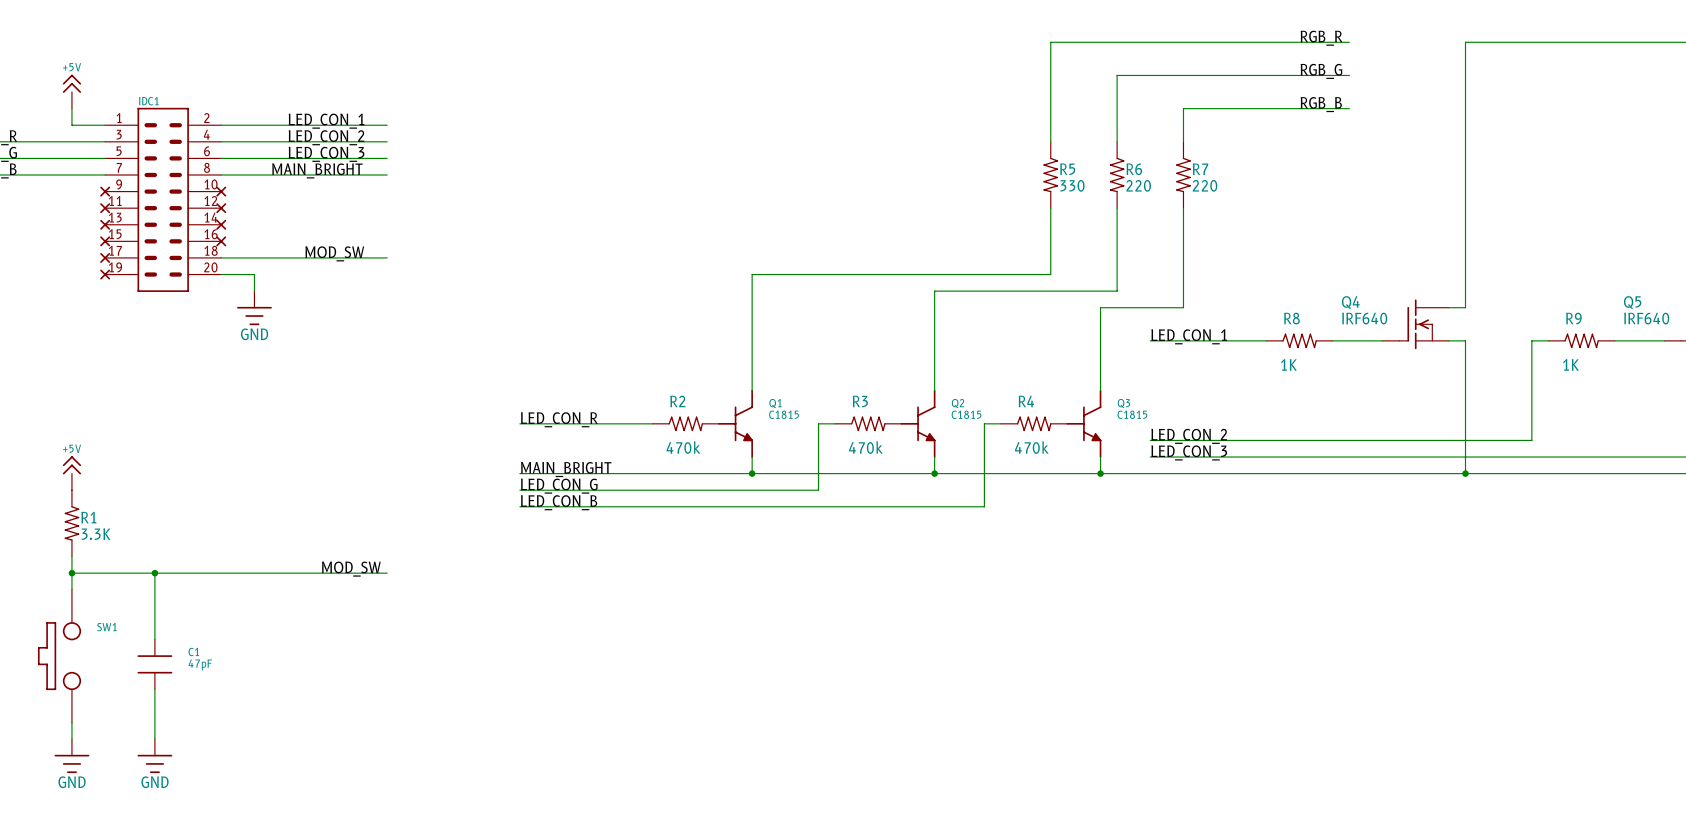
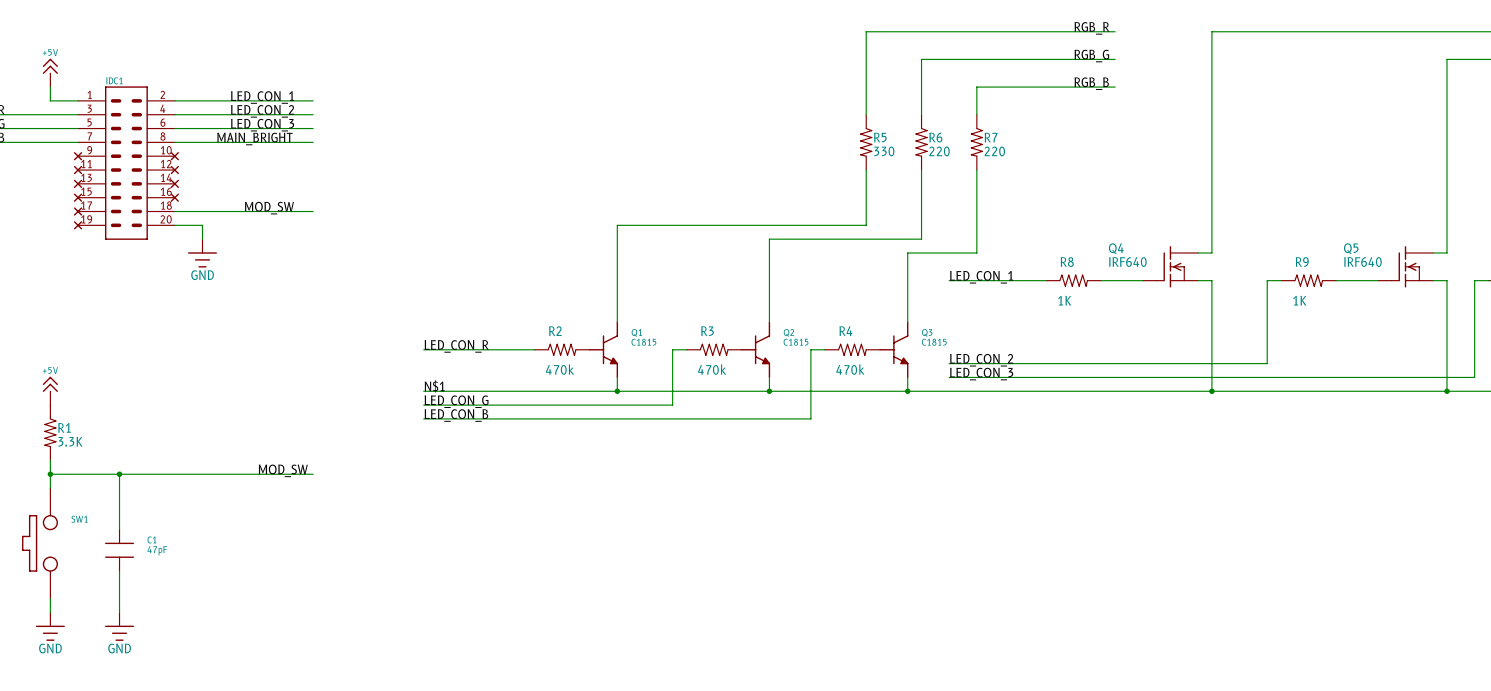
label: MAIN_BRIGHT (566, 469) -> N$1 (434, 386)

